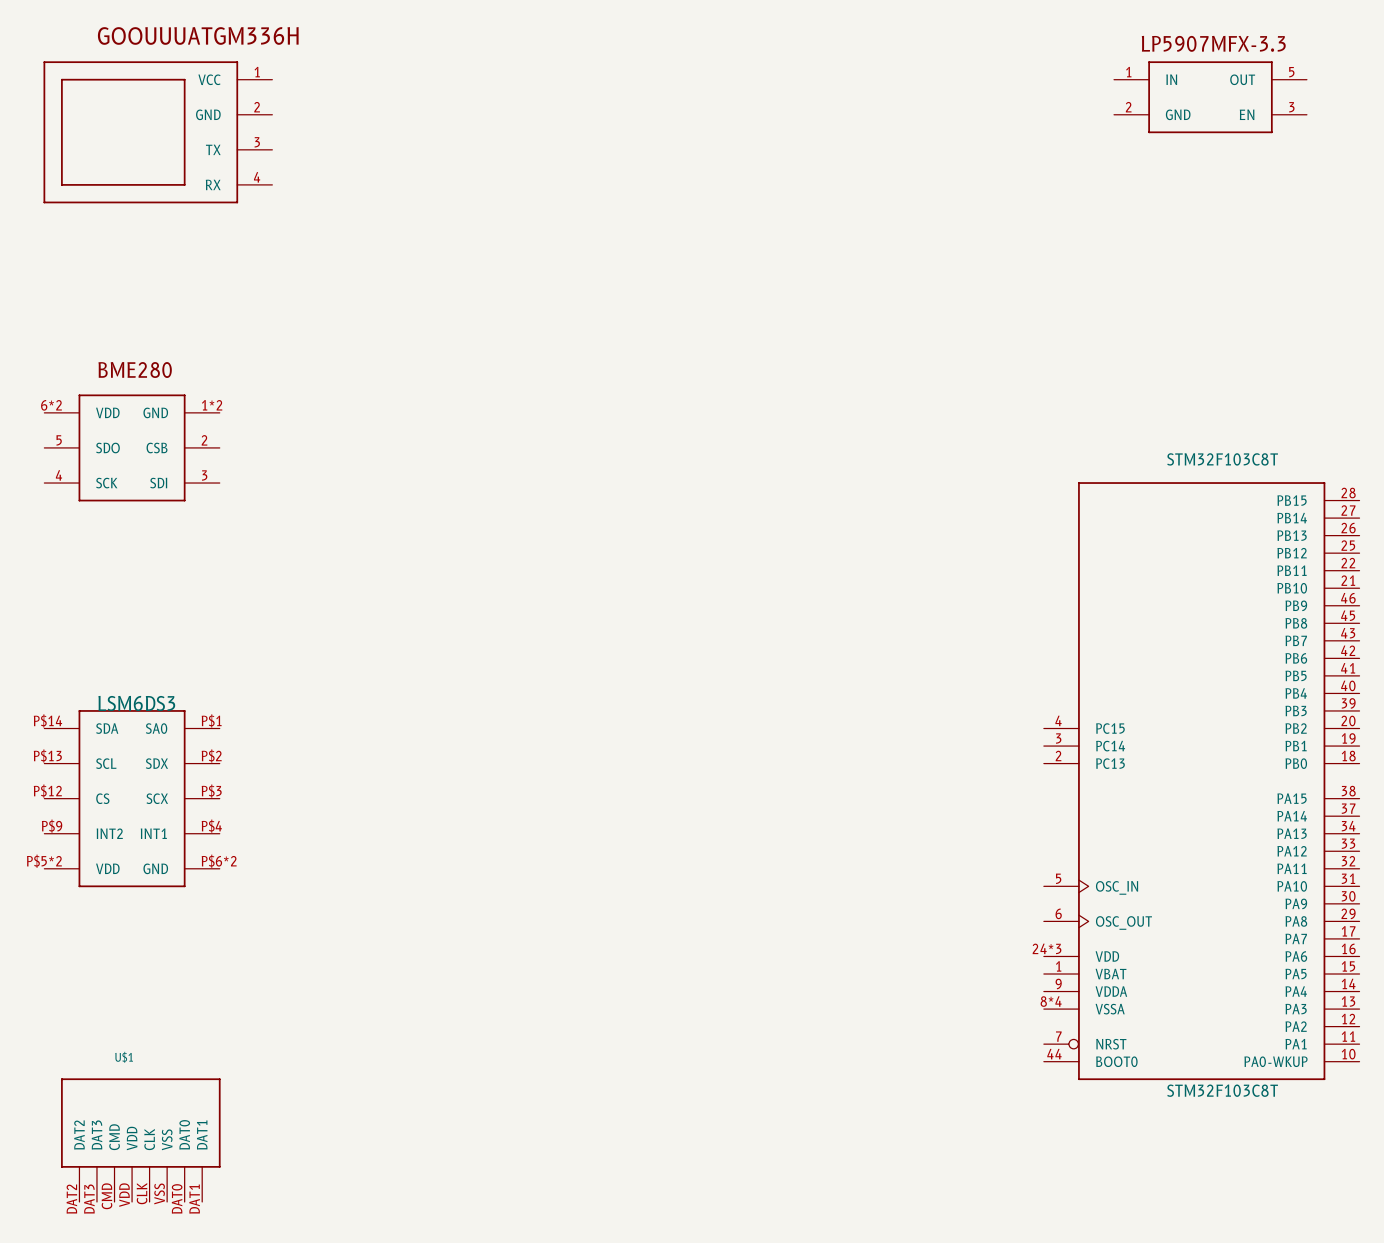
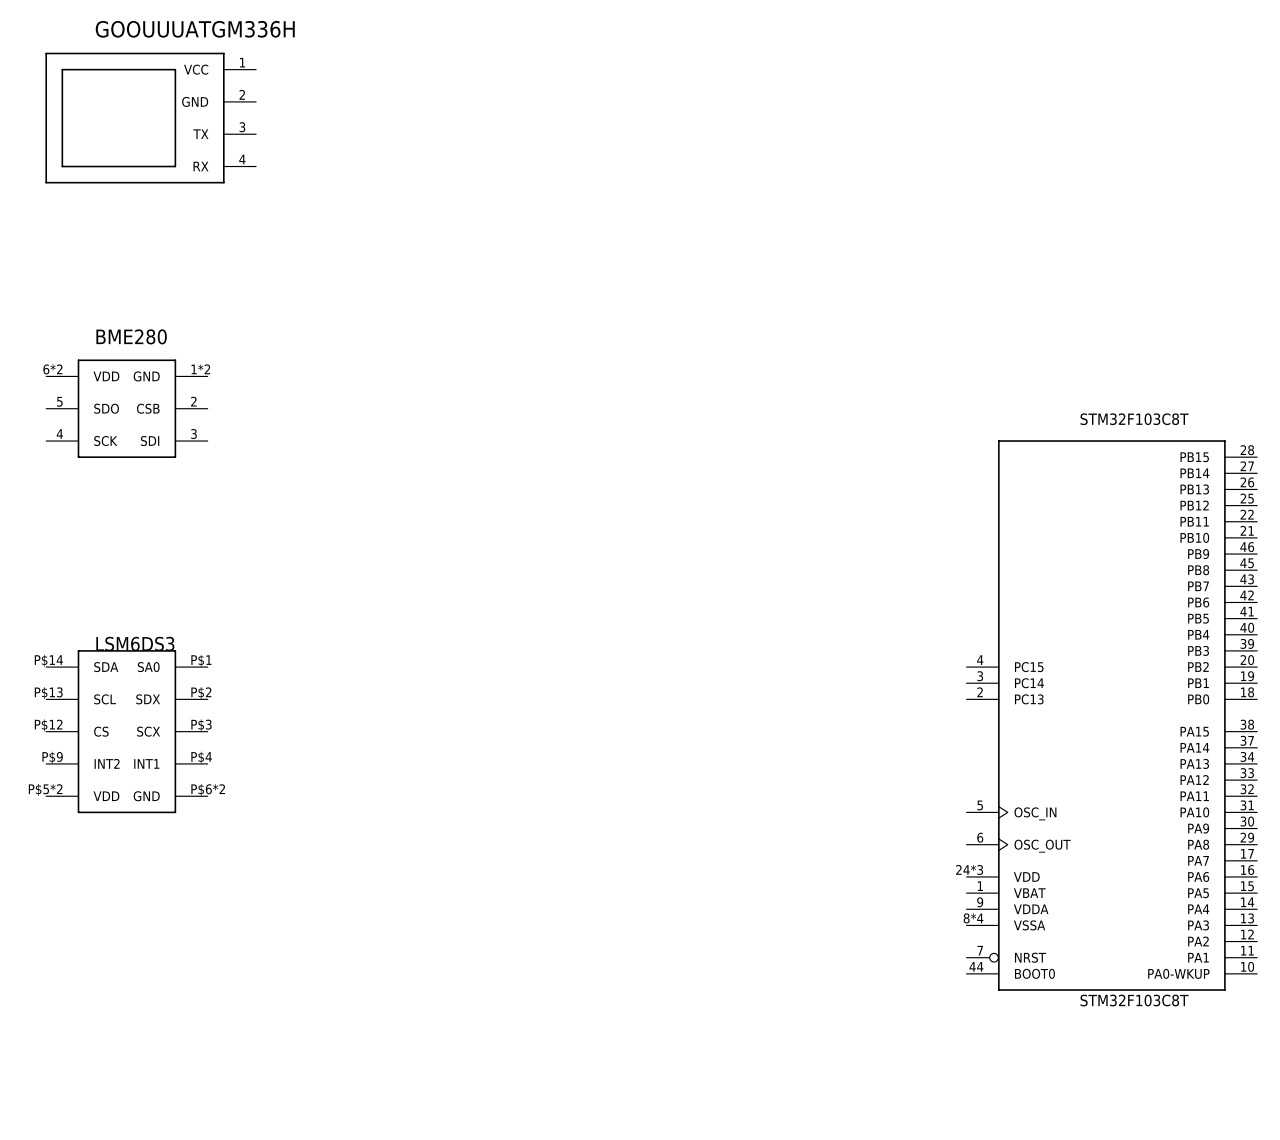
LP5907MFX-3.3: (1210, 97) -> none
U$1: (140, 1140) -> none

